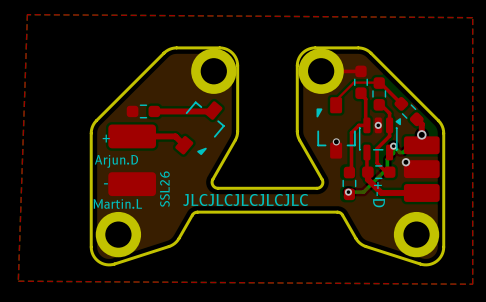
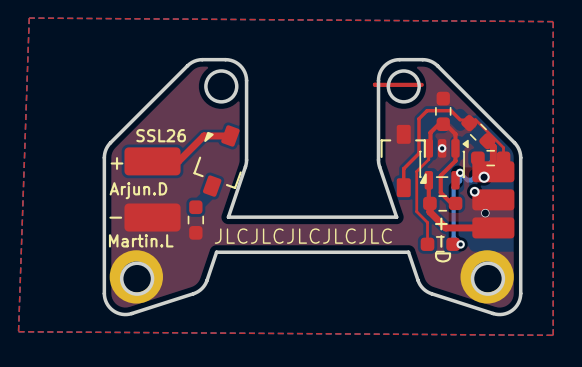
board edge: (161, 55) (174, 47) (219, 47) (228, 50) (236, 58) (237, 133) (212, 180) (214, 187) (316, 188) (321, 185) (322, 180) (297, 133) (298, 59) (304, 51) (313, 48) (360, 47) (368, 50) (442, 126) (442, 253) (434, 262) (424, 264) (365, 246) (357, 240) (342, 214) (337, 212) (196, 212) (192, 214) (179, 238) (172, 244) (112, 264) (104, 264) (96, 260) (91, 247) -> (187, 65) (199, 59) (228, 59) (240, 65) (245, 75) (246, 161) (228, 217) (396, 217) (378, 163) (379, 76) (384, 65) (394, 60) (424, 59) (434, 63) (514, 142) (519, 149) (520, 157) (519, 300) (512, 310) (498, 314) (429, 292) (418, 282) (408, 252) (216, 252) (206, 282) (200, 290) (127, 314) (119, 313) (111, 308) (105, 300) (104, 291)
round board edge: none -> [204, 69, 239, 104]
round board edge: none -> [386, 69, 421, 104]
part: (213, 71) -> none
part: (321, 71) -> none
part: (360, 82) -> none
top track: (360, 93) (365, 99) (366, 125) (358, 125) (351, 132) (351, 167) (348, 170) -> none
top track: none -> (439, 123) (430, 132) (430, 146)
top track: (336, 106) (336, 100) (353, 82) (380, 83) (401, 103) (399, 106) -> none
top track: (213, 110) (154, 111) -> none
part rotation: 0° (143, 111) -> 90° clockwise (195, 220)
part position: (143, 111) -> (195, 220)
top track: none -> (428, 148) (428, 159) (416, 171) (416, 211) (427, 222) (427, 244)
part rotation: 0° (336, 127) -> 180° (403, 161)
part: (200, 128) -> none
part: none -> (490, 158)
top track: none -> (503, 158) (503, 147) (475, 119) (460, 119) (450, 110) (427, 110) (418, 118) (418, 153) (403, 168) (403, 187)
via position: (421, 134) -> (484, 177)
top track: (154, 136) (175, 136) (184, 145) (184, 141) -> (178, 161) (203, 135) (230, 135)
part: none -> (217, 161)
via: (336, 141) -> none
bottom track: (388, 158) (387, 168) (363, 192) (348, 192) -> (453, 187) (453, 237) (460, 244)
via: none -> (485, 213)
part rotation: 0° (349, 183) -> 90° clockwise (440, 244)
part position: (349, 183) -> (440, 244)
text rotation: 0° (164, 189) -> 90° clockwise (161, 135)
text position: SSL26 (164, 189) -> SSL26 (161, 135)
via position: (348, 192) -> (460, 244)
round board edge: none -> [119, 261, 155, 296]
round board edge: none -> [470, 261, 506, 296]

